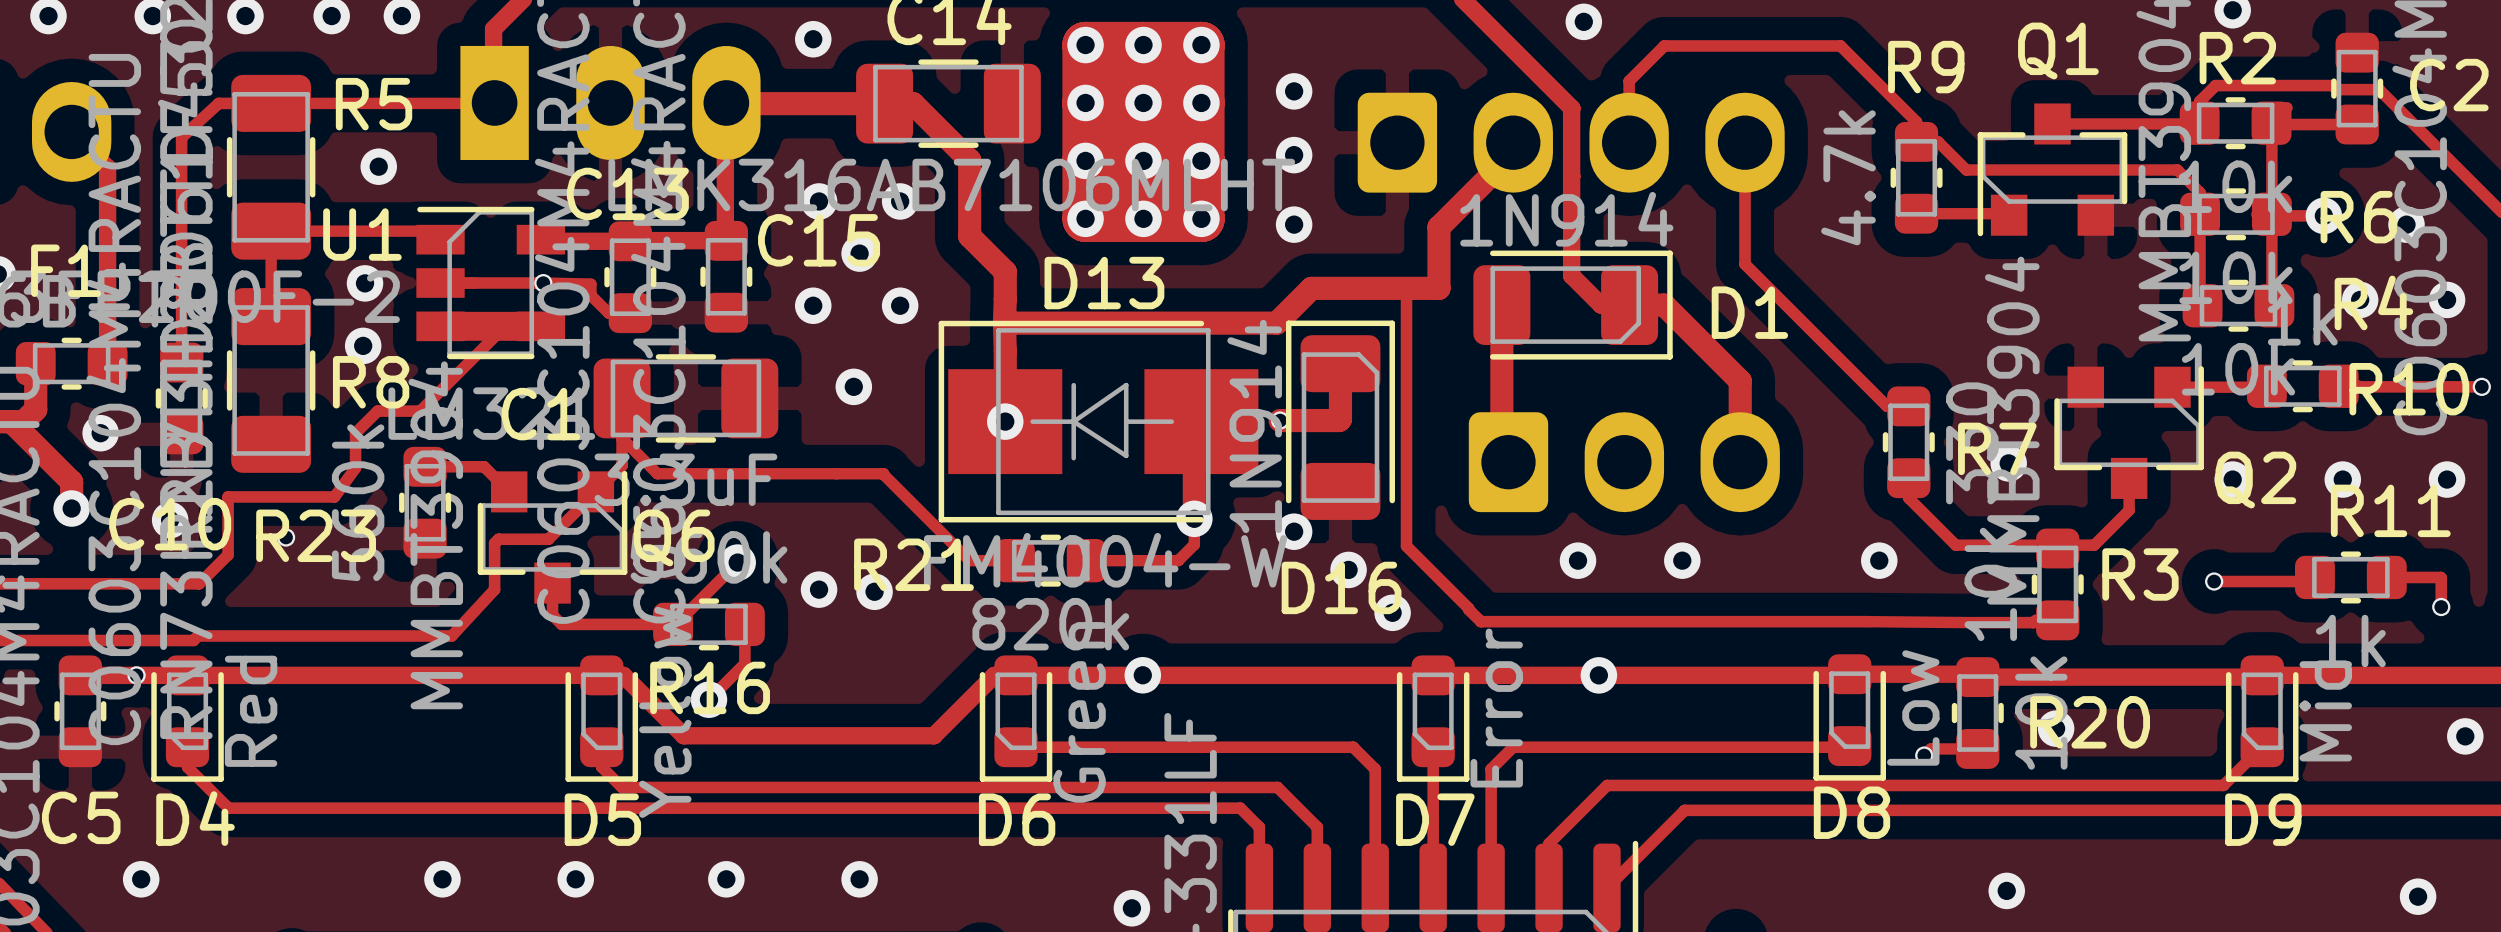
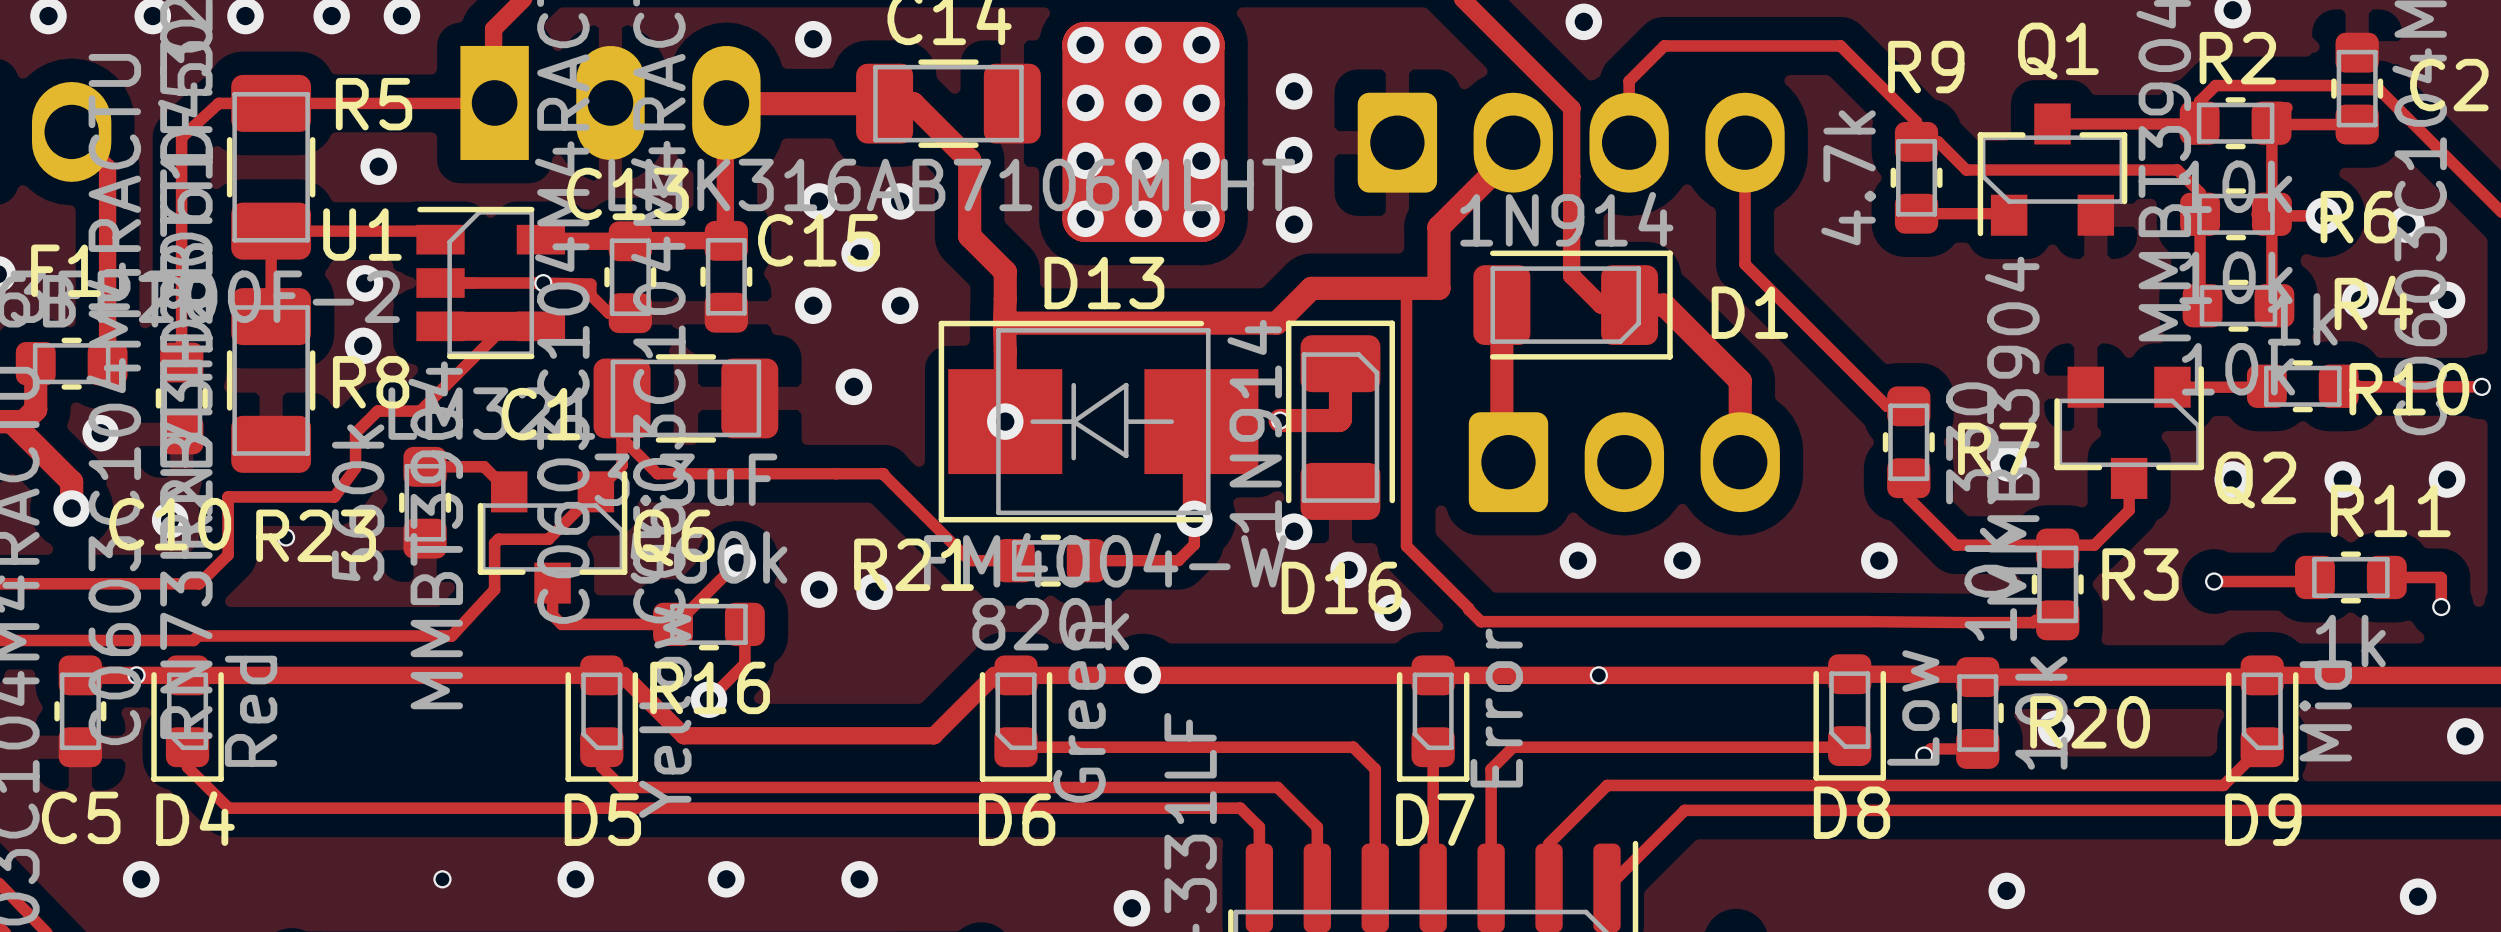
via size: [1580, 657, 1618, 694] -> [1589, 666, 1609, 685]
via size: [424, 861, 461, 898] -> [433, 870, 452, 889]

